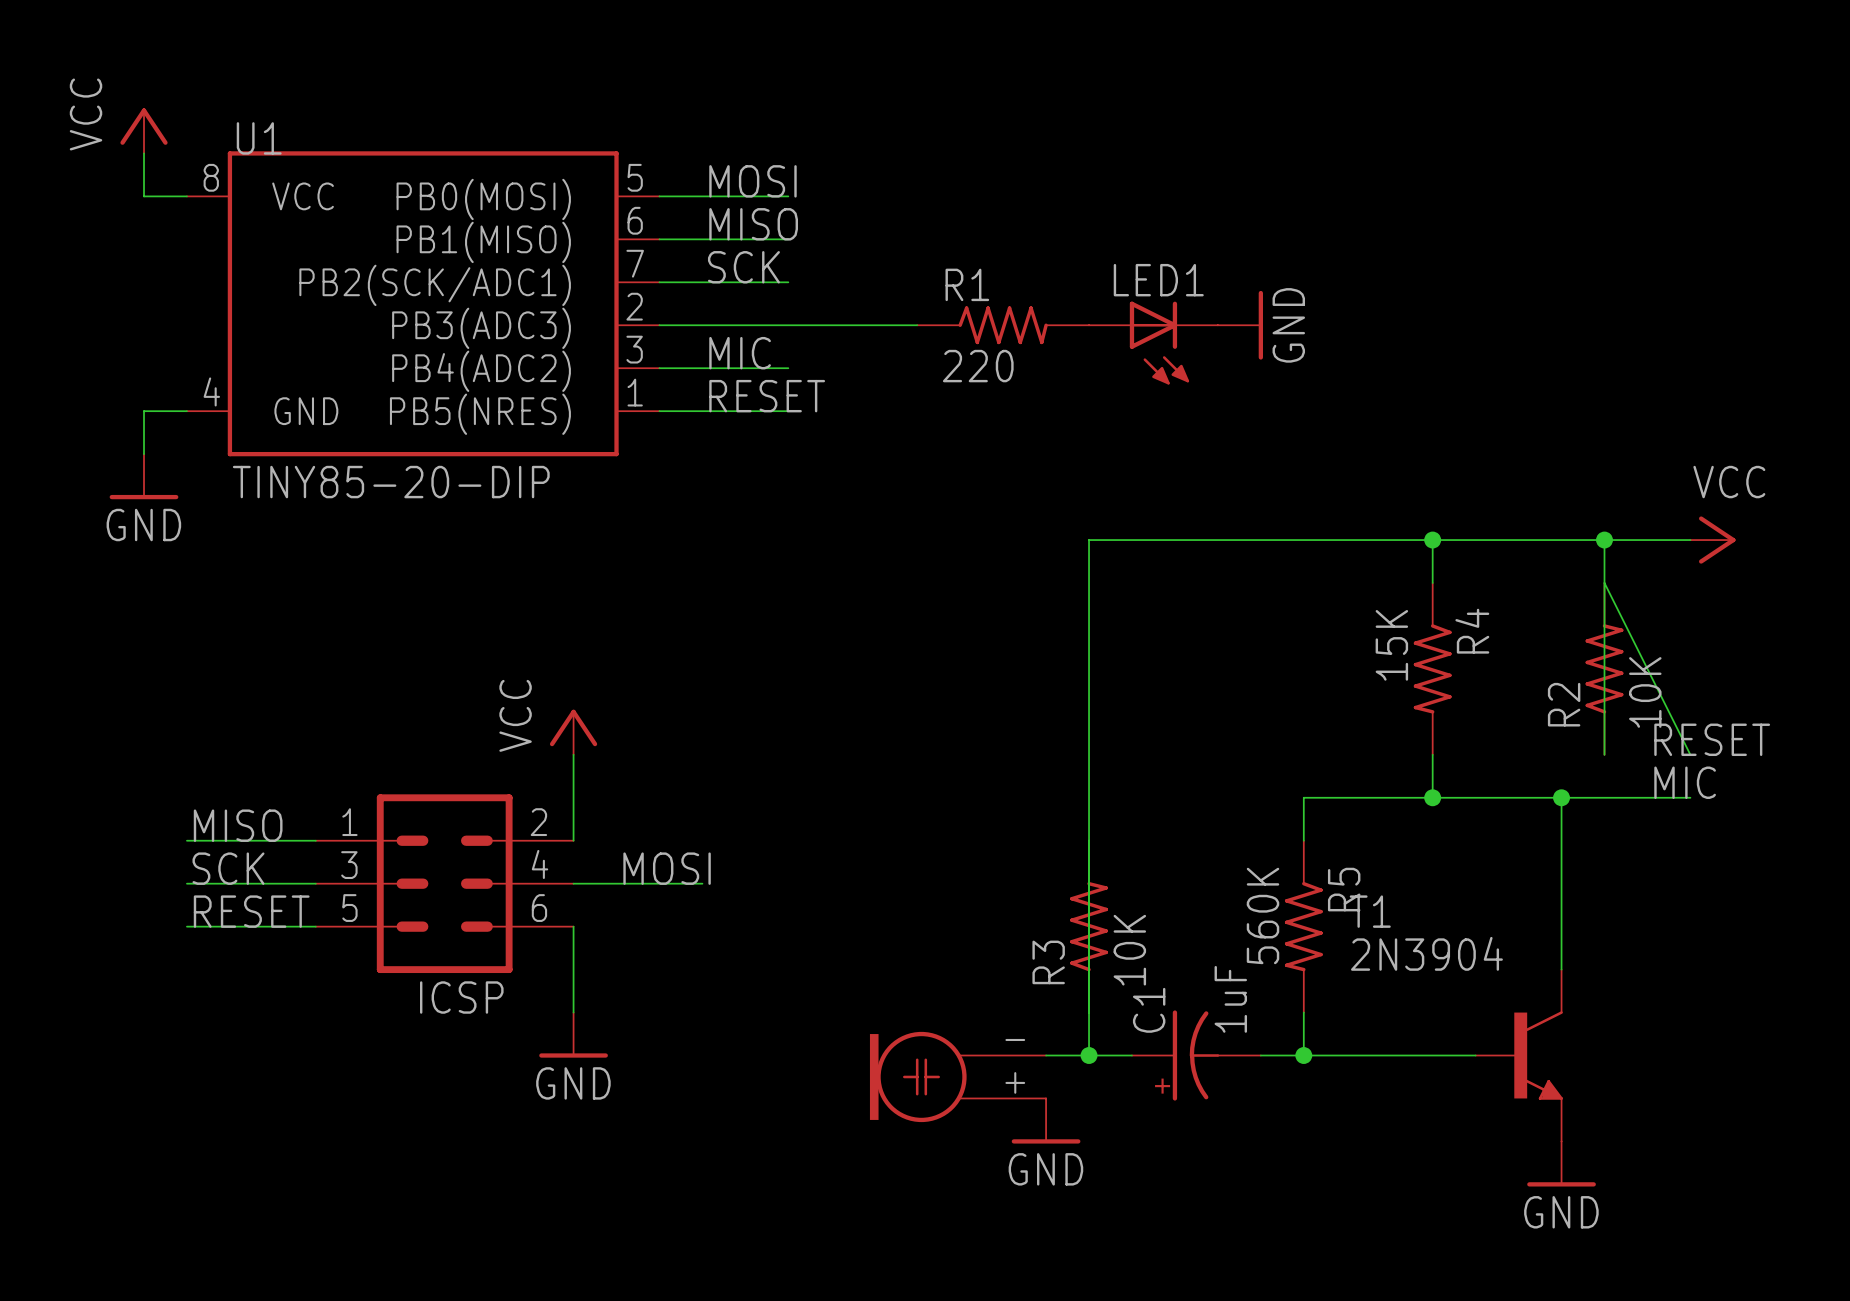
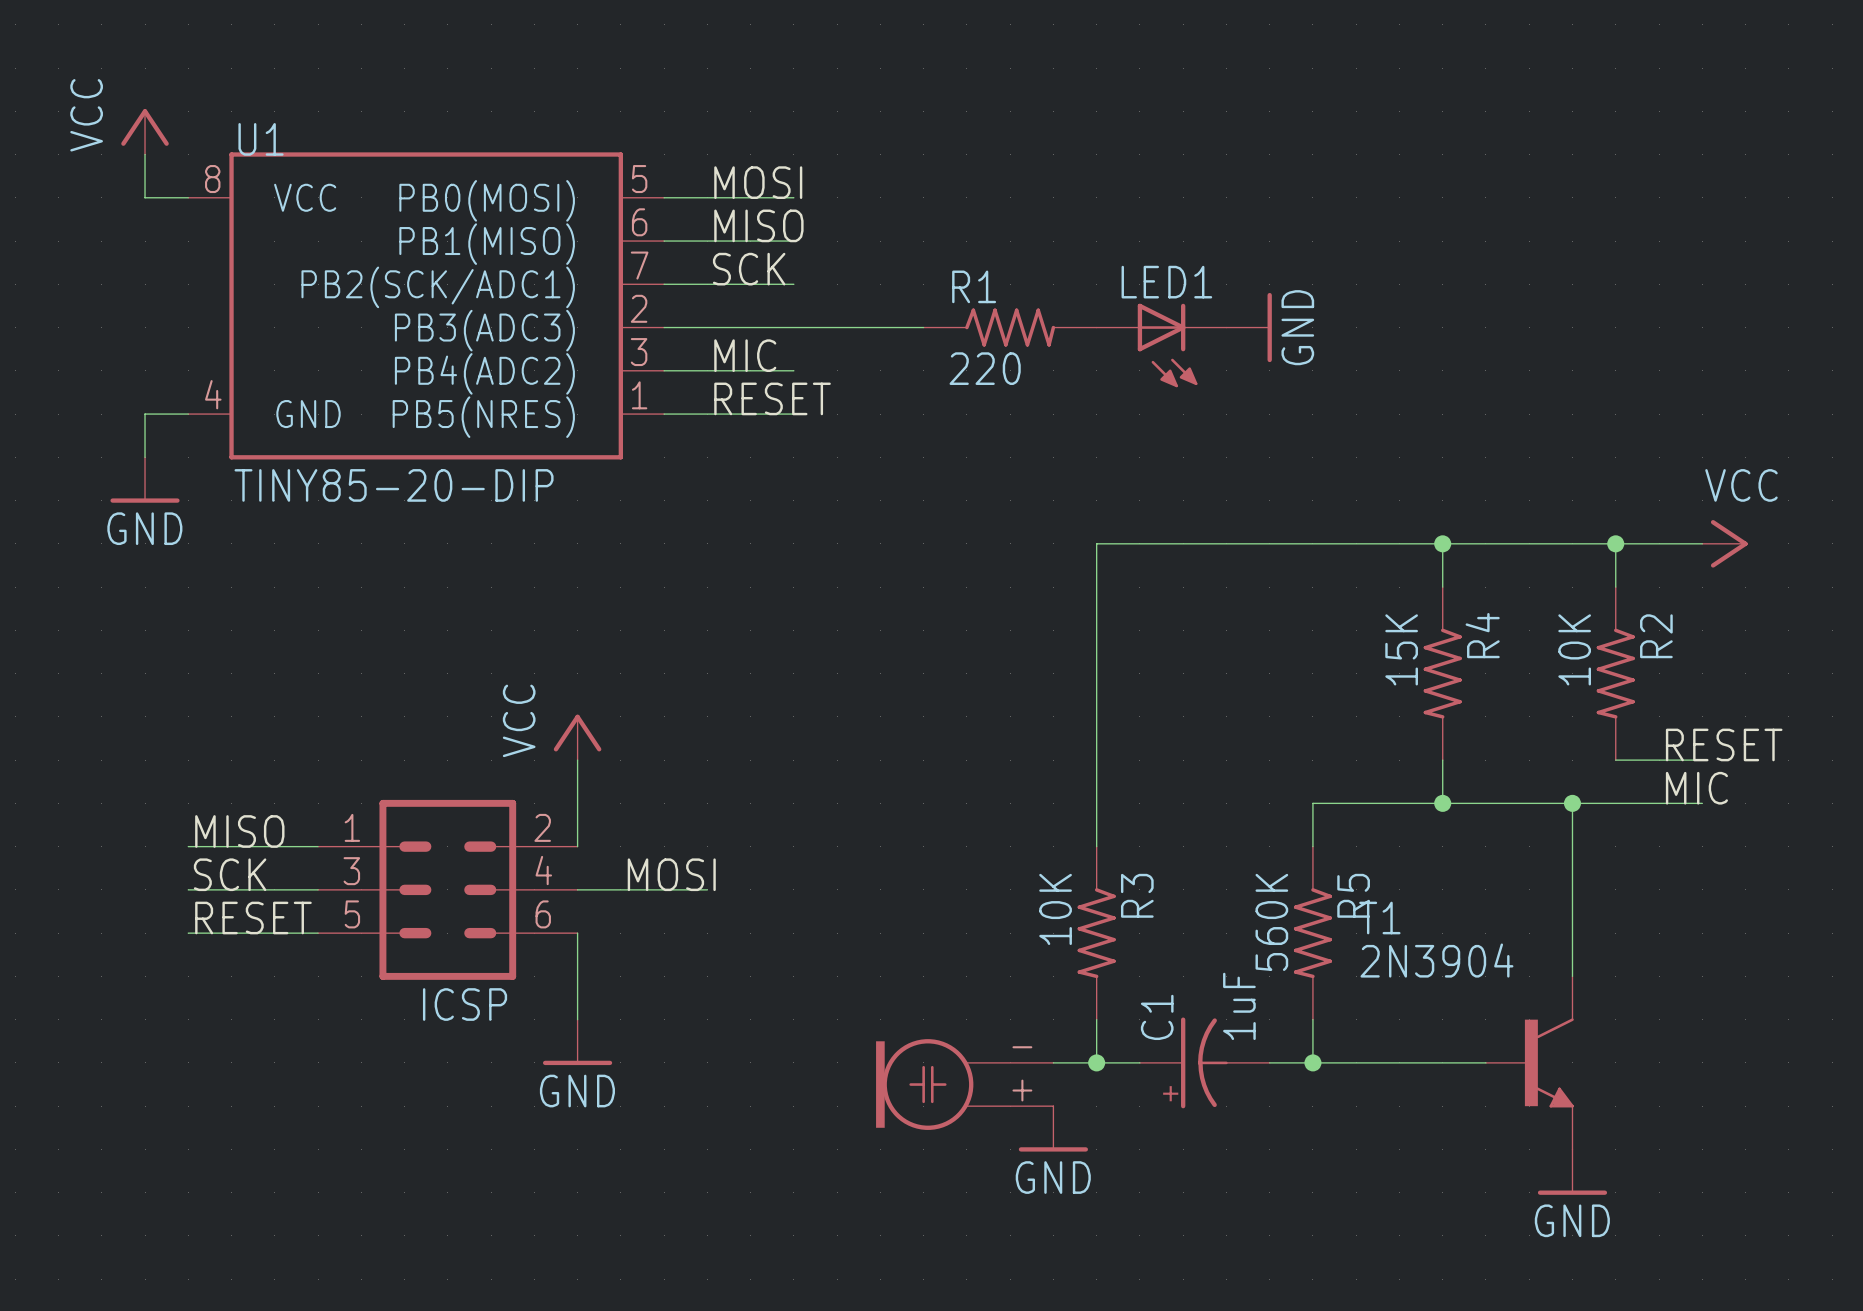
R2 rotation: 0° (1604, 668) -> 180° (1615, 673)
wire: (1604, 754) (1604, 582) (1690, 754) -> (1615, 760) (1702, 760)
R3 rotation: 0° (1089, 926) -> 180° (1096, 933)

